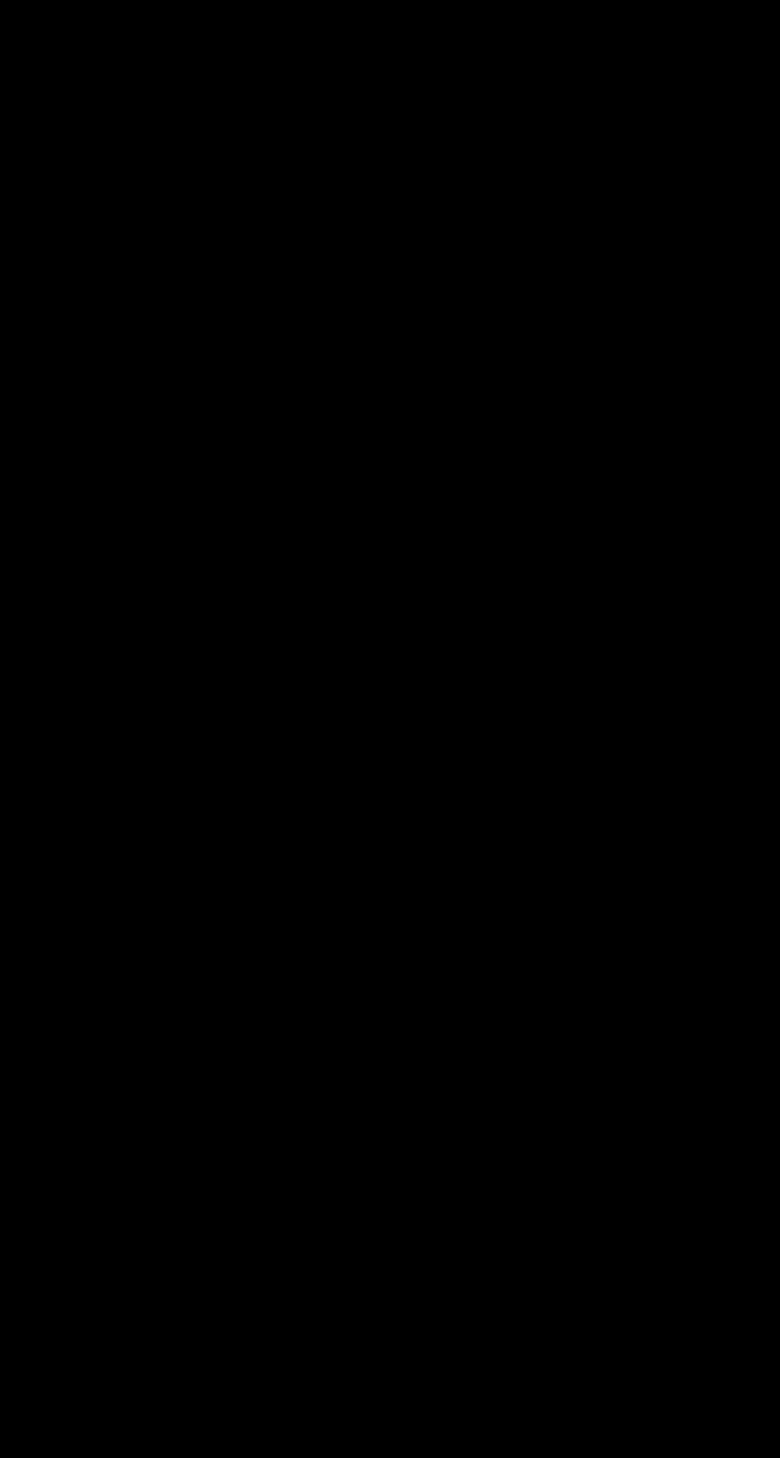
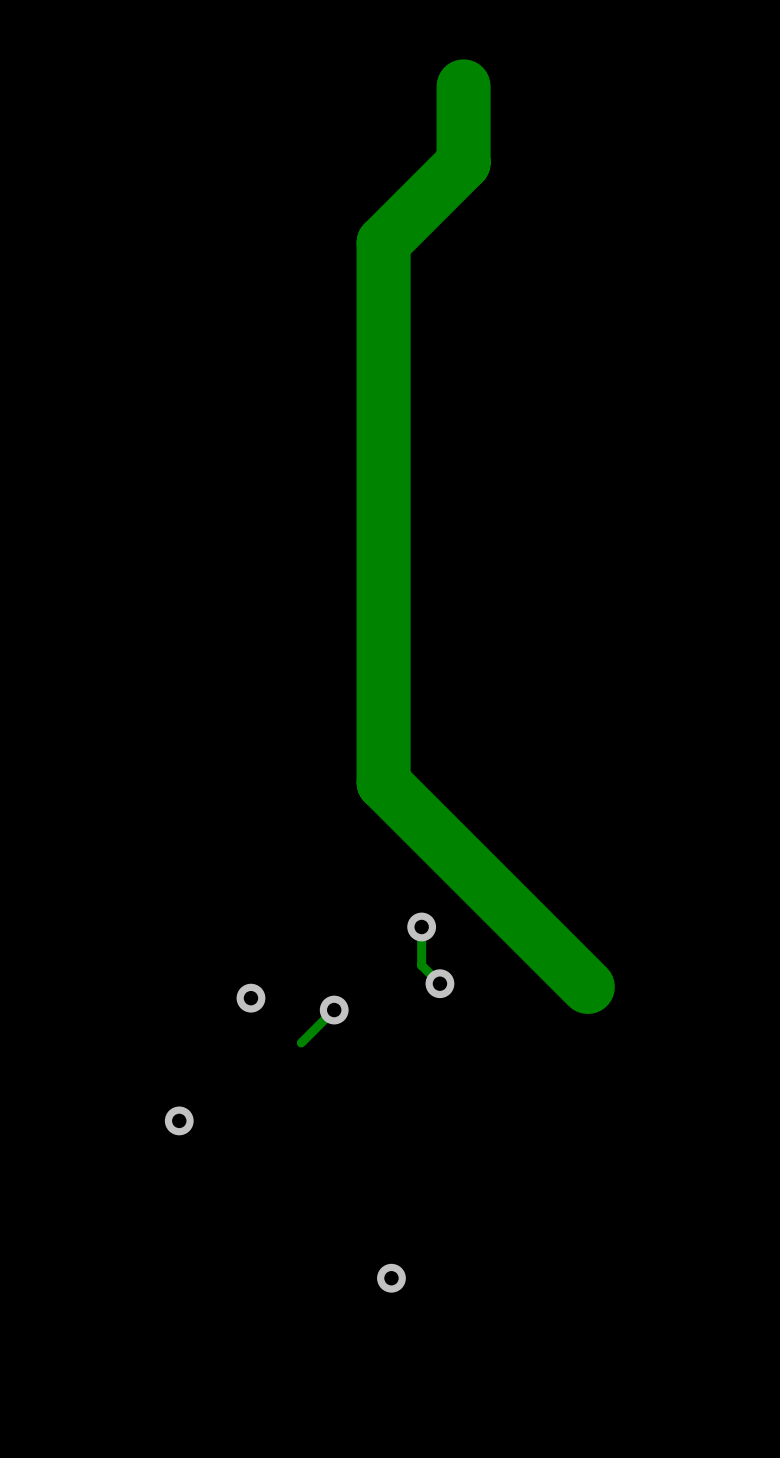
track: none -> (463, 86) (463, 162) (383, 242) (383, 782) (587, 987)
track: none -> (421, 926) (421, 965) (439, 983)
via: none -> (421, 926)
via: none -> (439, 983)
via: none -> (250, 998)
track: none -> (334, 1010) (301, 1042)
via: none -> (334, 1010)
via: none -> (179, 1120)
via: none -> (391, 1278)

